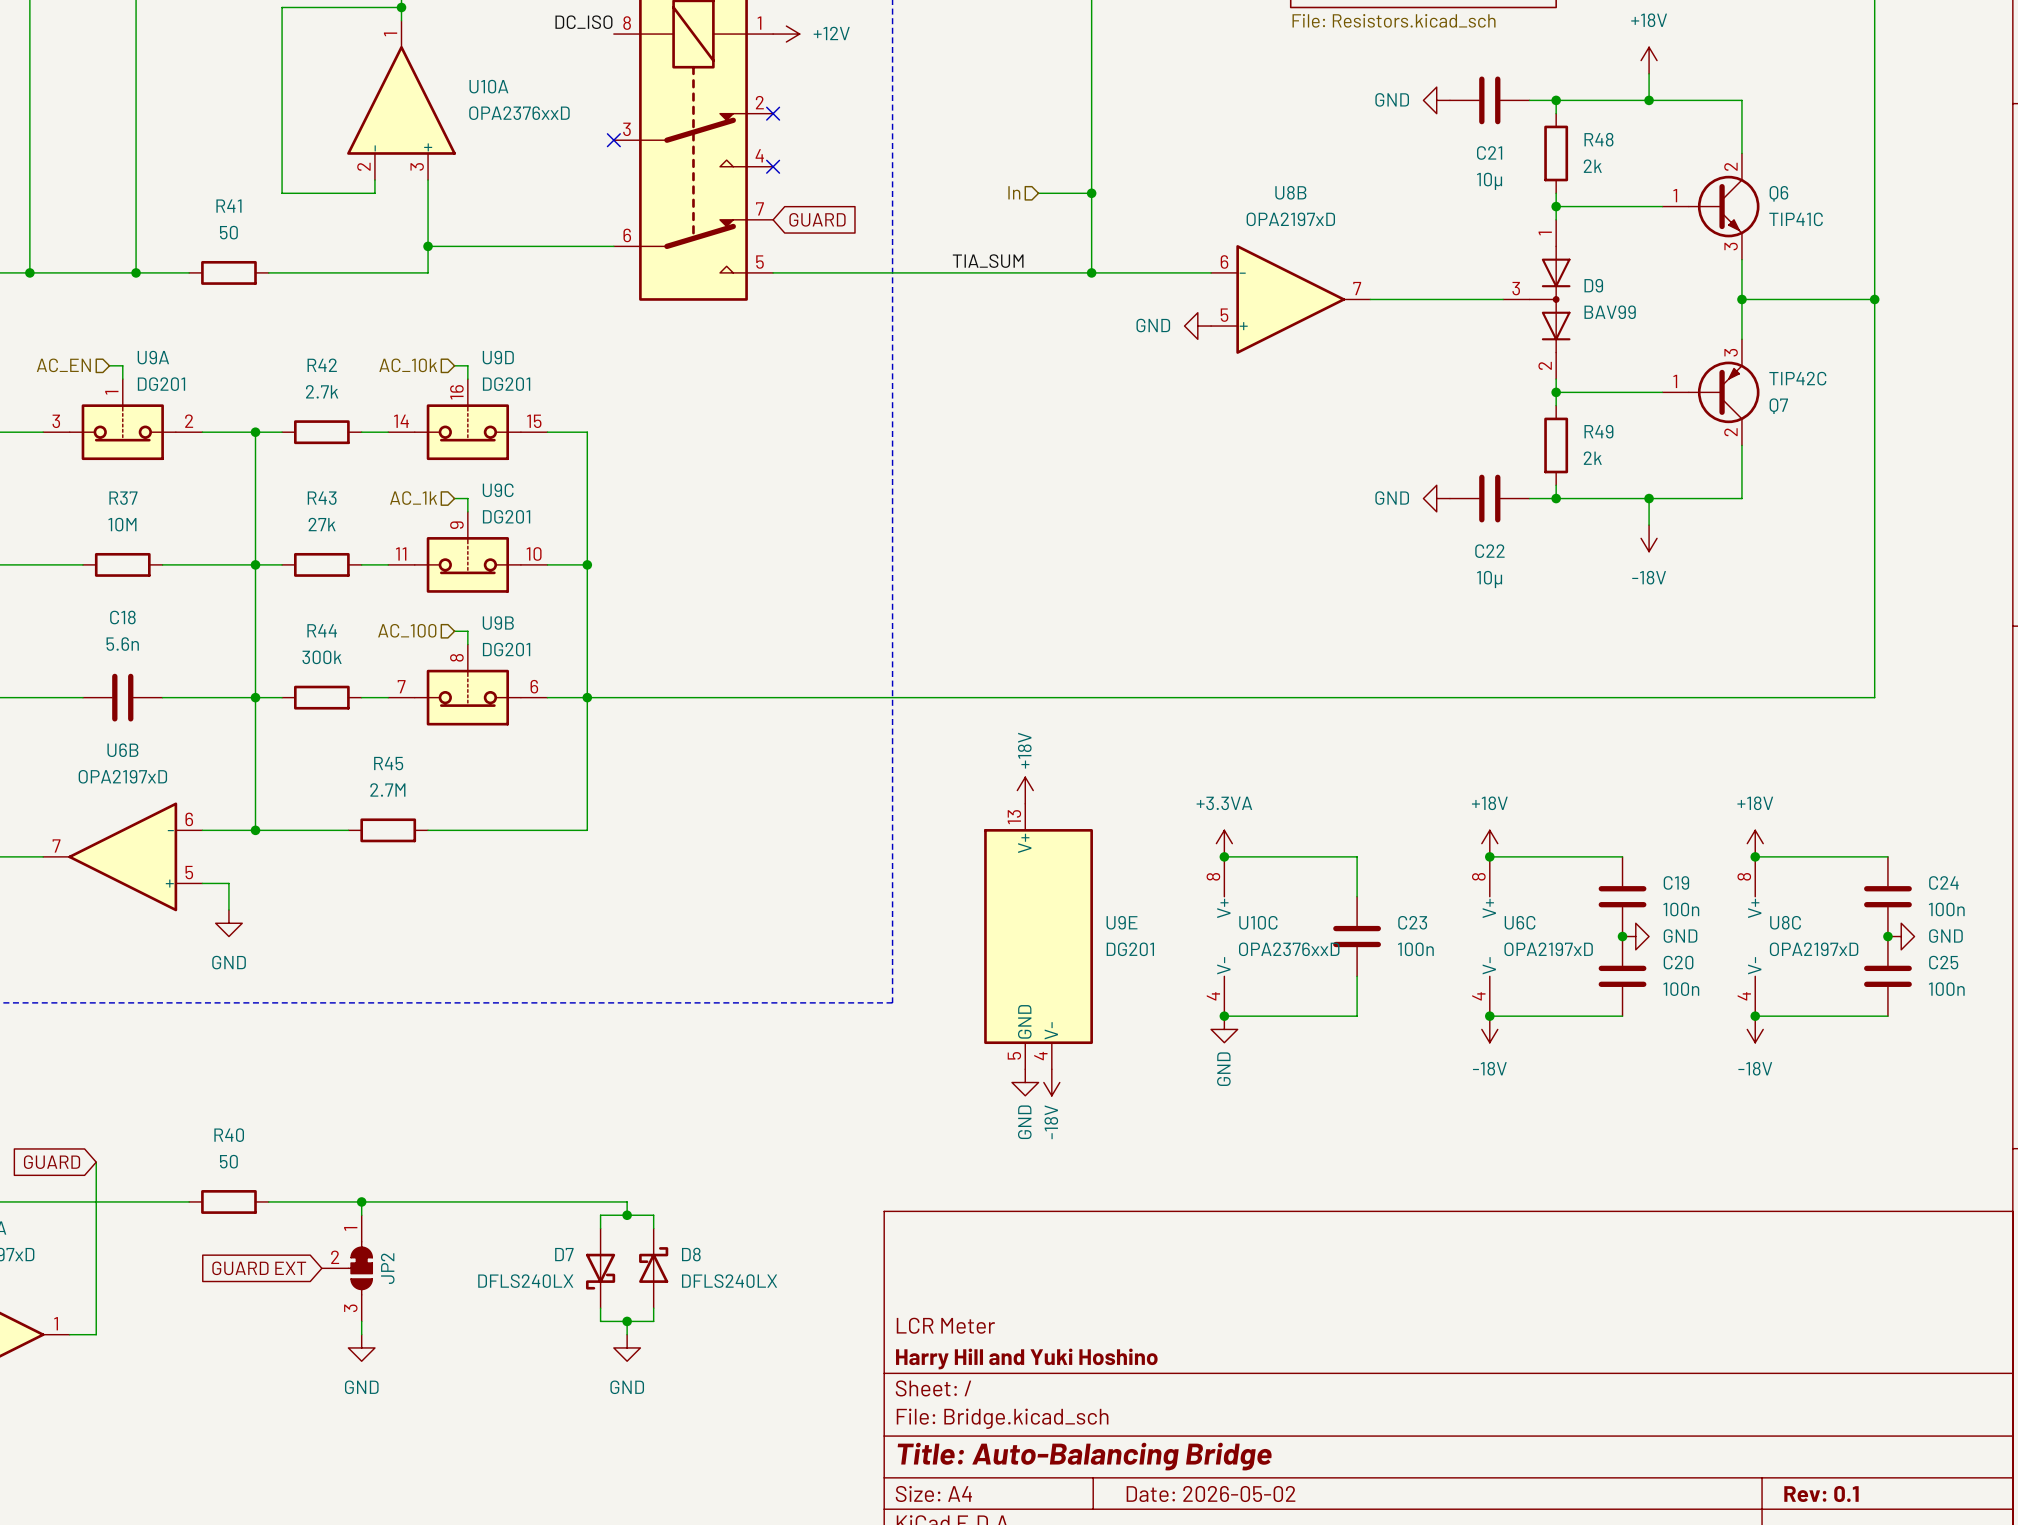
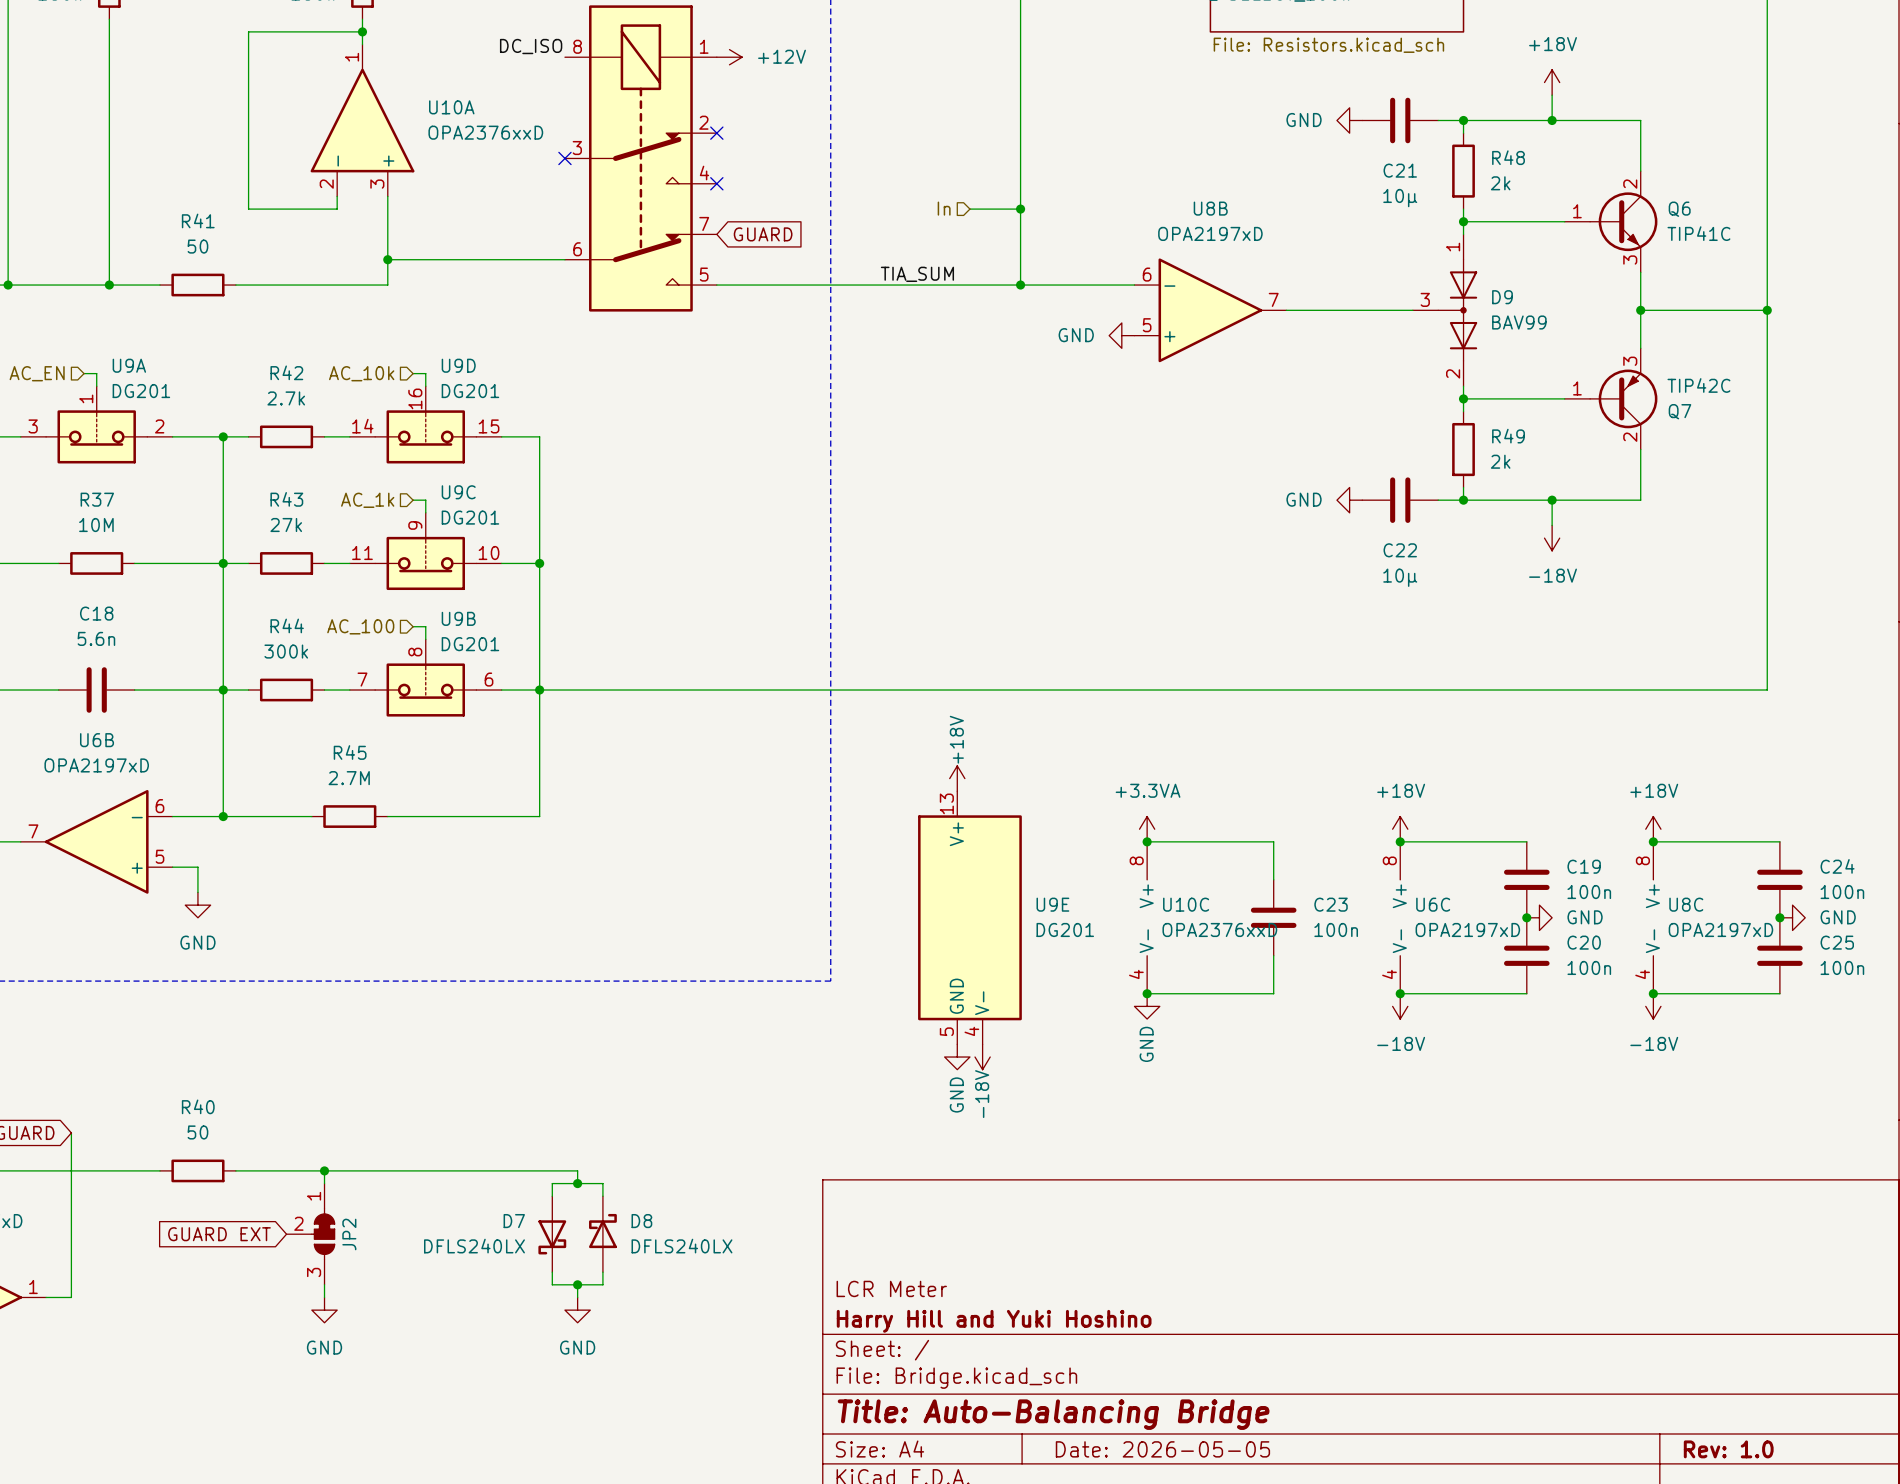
title block: Date: 2026-05-02 (1211, 1494) -> Date: 2026-05-05 (1162, 1449)
title block: Rev: 0.1 (1821, 1494) -> Rev: 1.0 (1728, 1449)

